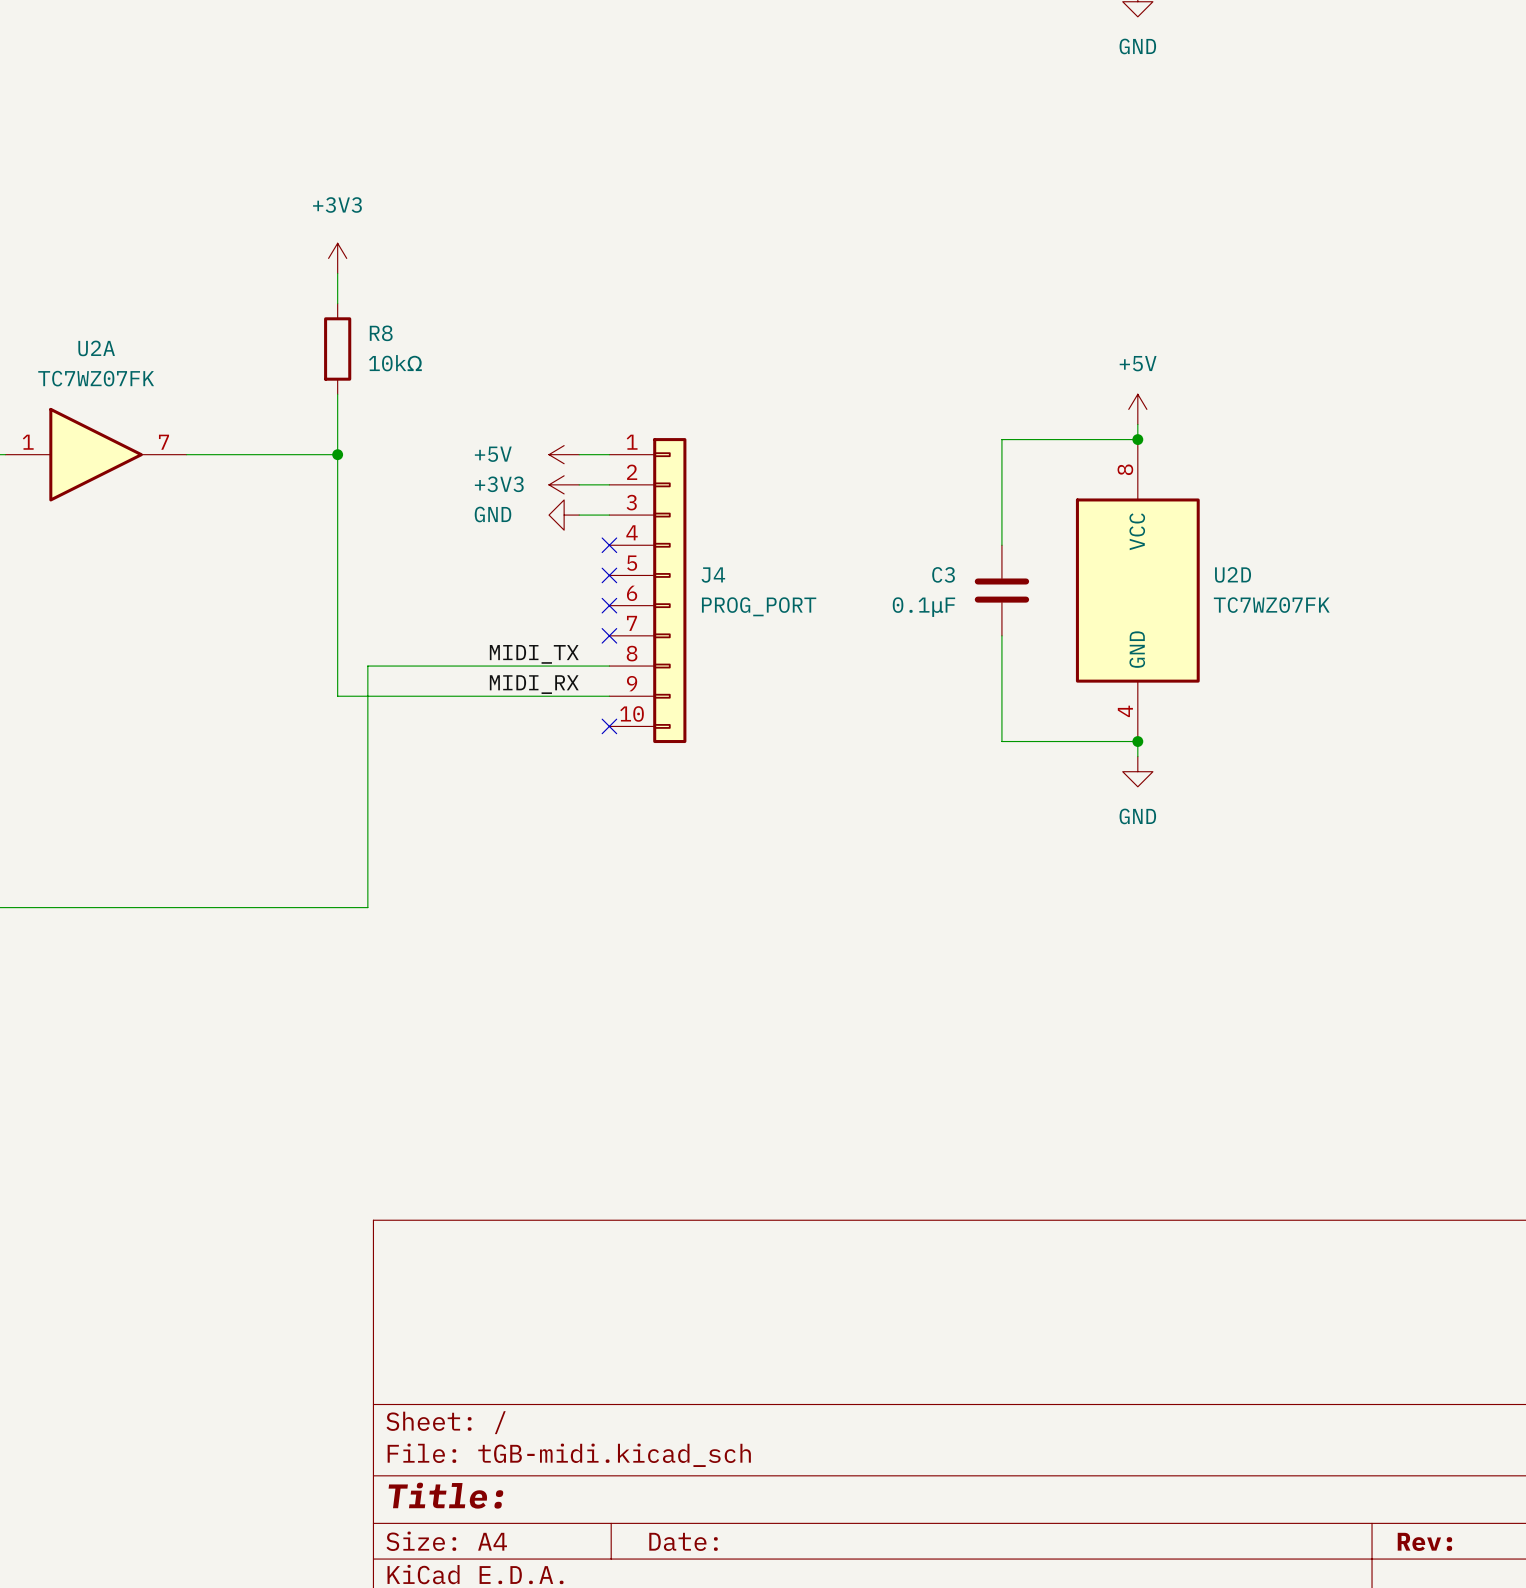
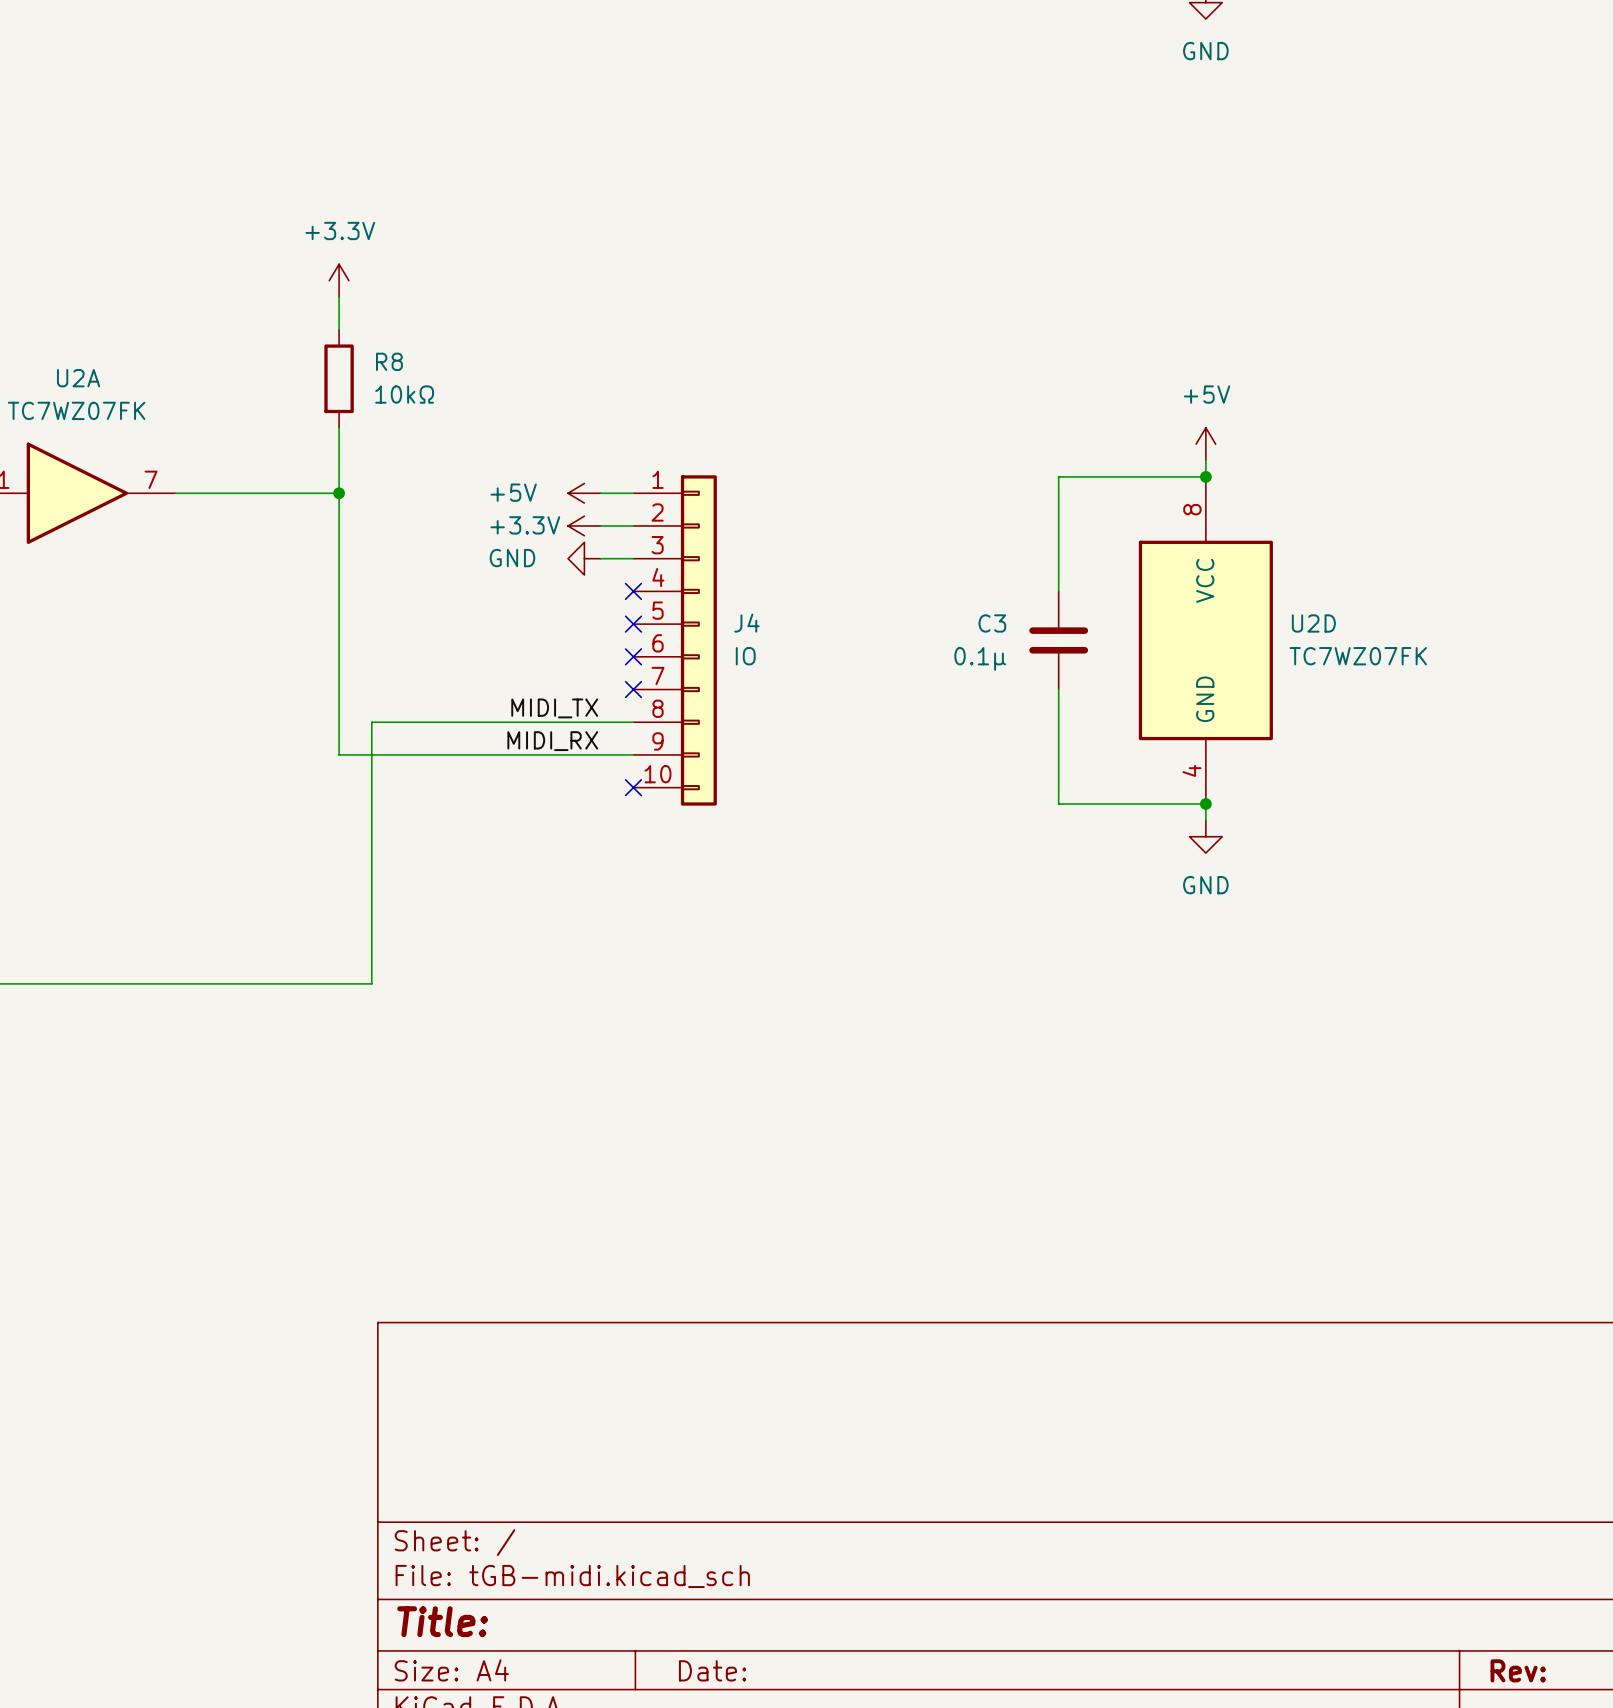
power symbol: +3V3 (337, 258) -> +3.3V (339, 280)
power symbol: +3V3 (564, 484) -> +3.3V (584, 525)
J4 value: PROG_PORT (759, 606) -> IO (745, 656)
C3 value: 0.1μF (923, 607) -> 0.1μ (980, 658)

